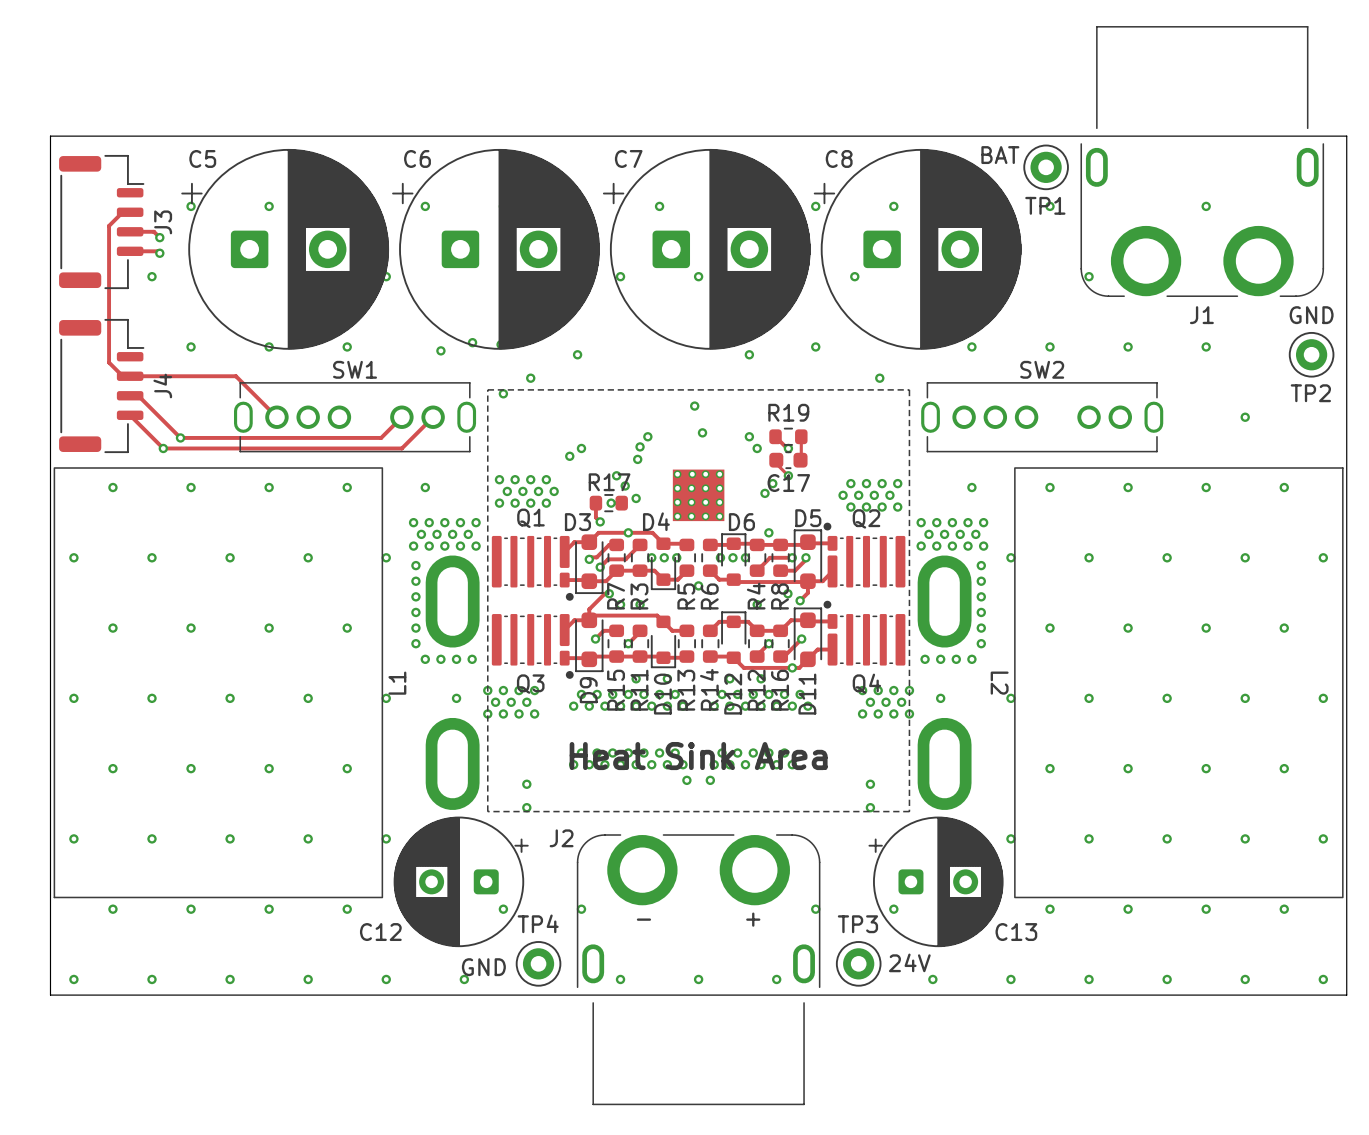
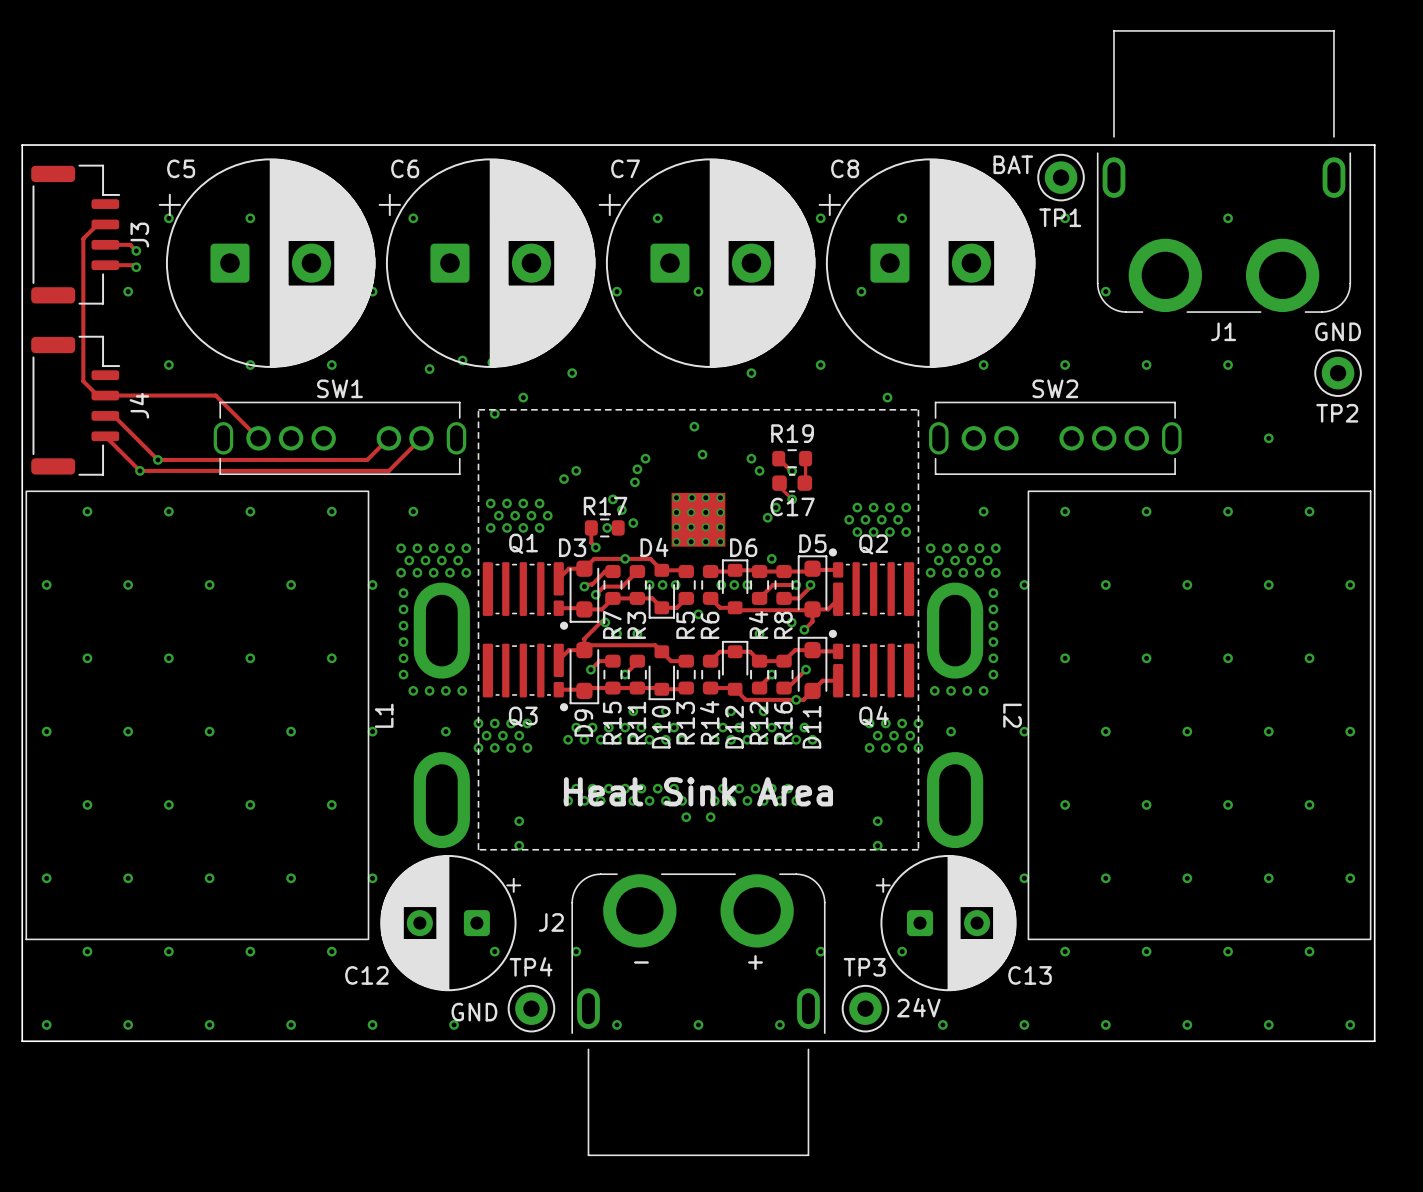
SW2 rotation: 0° (1042, 417) -> 180° (1055, 438)
J2 name position: J2 (561, 838) -> J2 (551, 922)

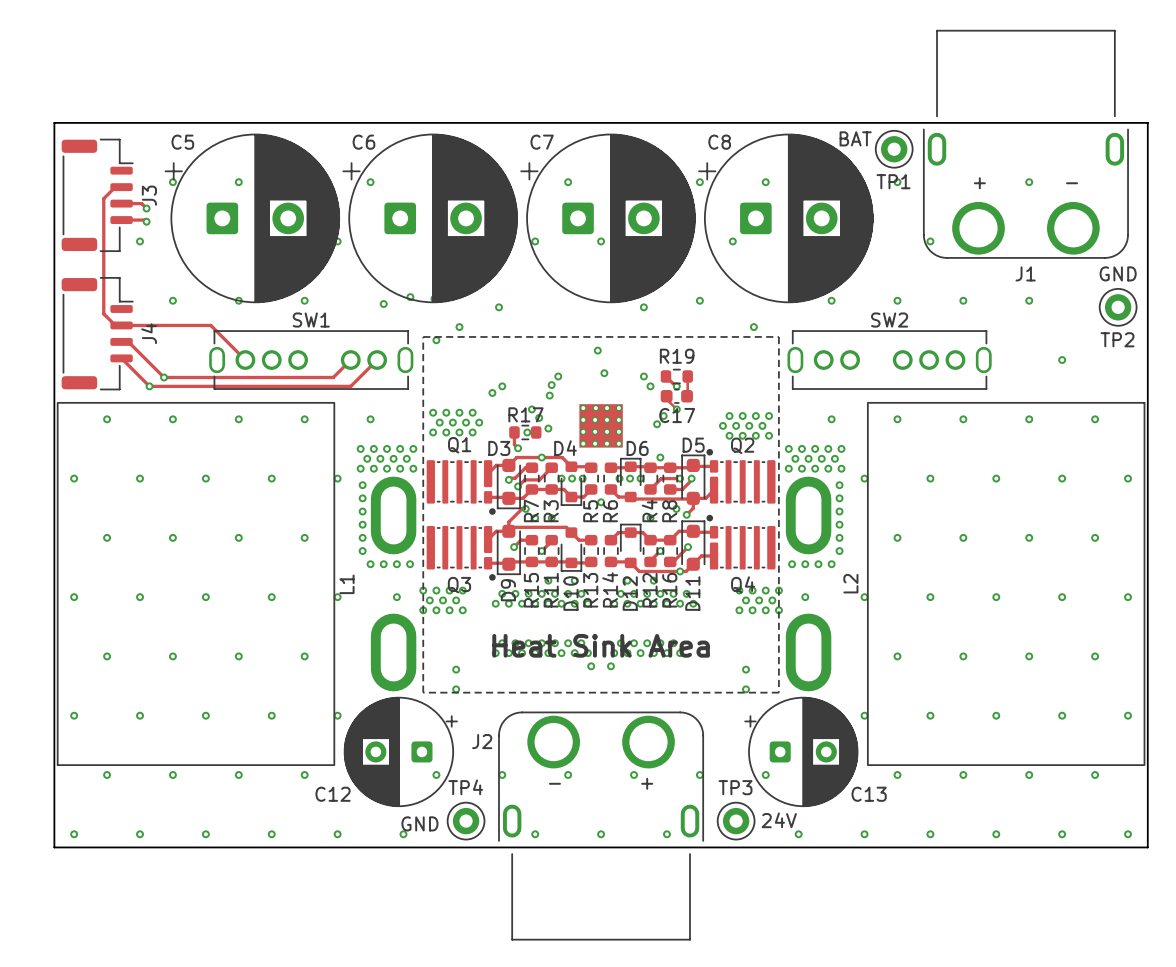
J1 footprint: [1096, 30, 1352, 313] -> [923, 30, 1129, 259]
text: none -> + (979, 183)
text: none -> - (1072, 183)
L2 name rotation: 0° (1012, 715) -> 180° (850, 583)
J2 footprint: [571, 873, 826, 1157] -> [498, 711, 704, 941]
via: none -> (568, 774)
via: none -> (634, 774)

